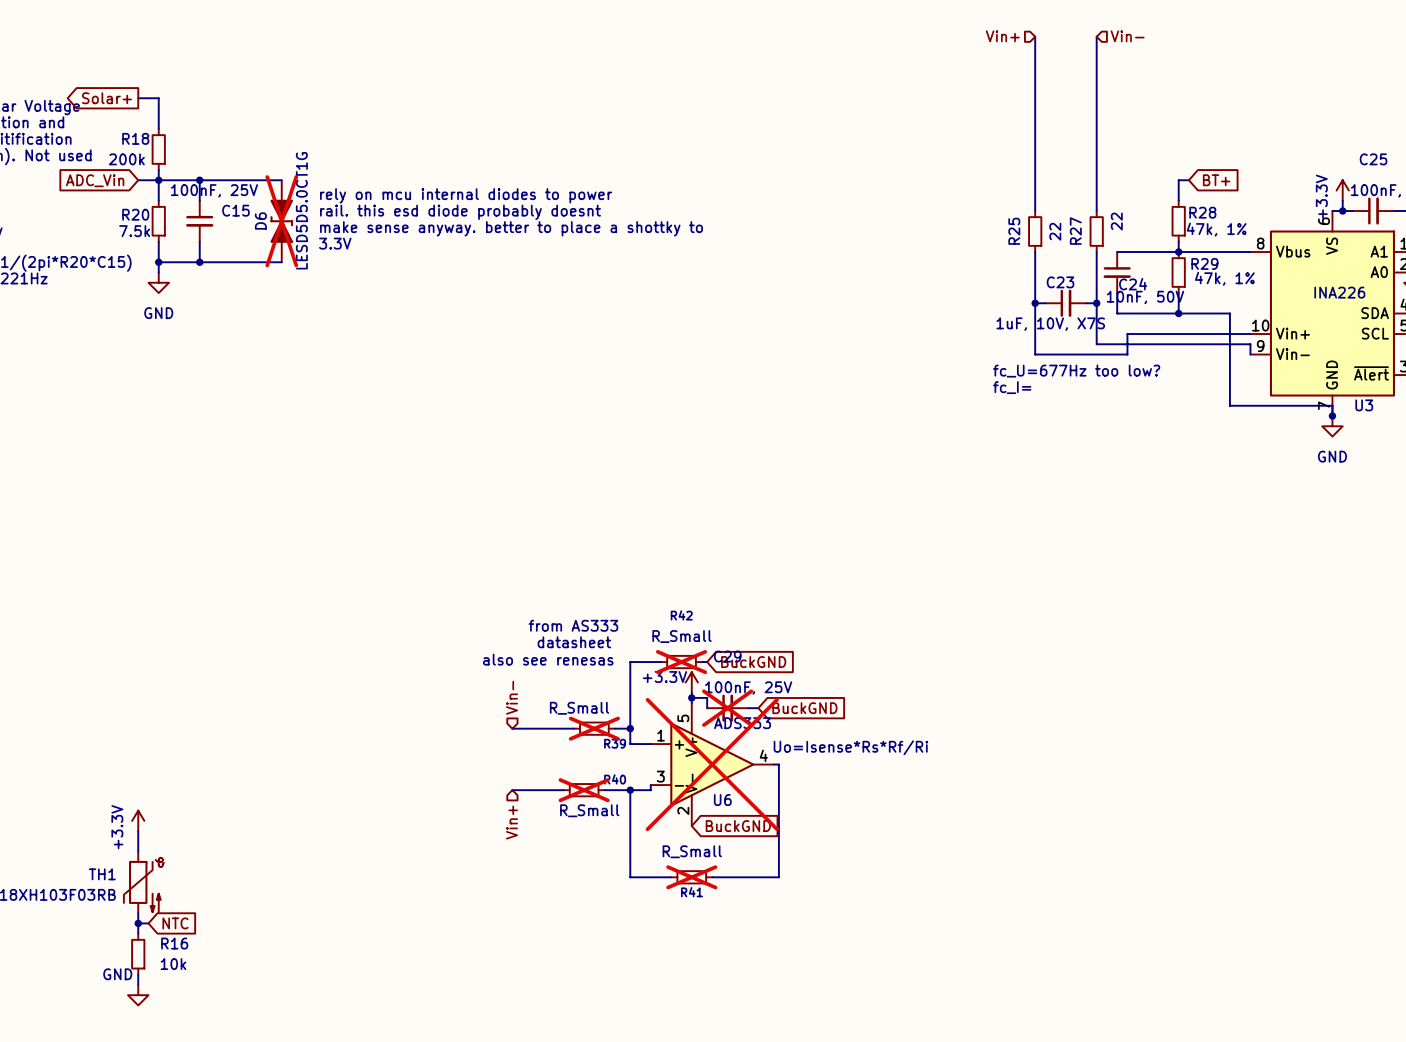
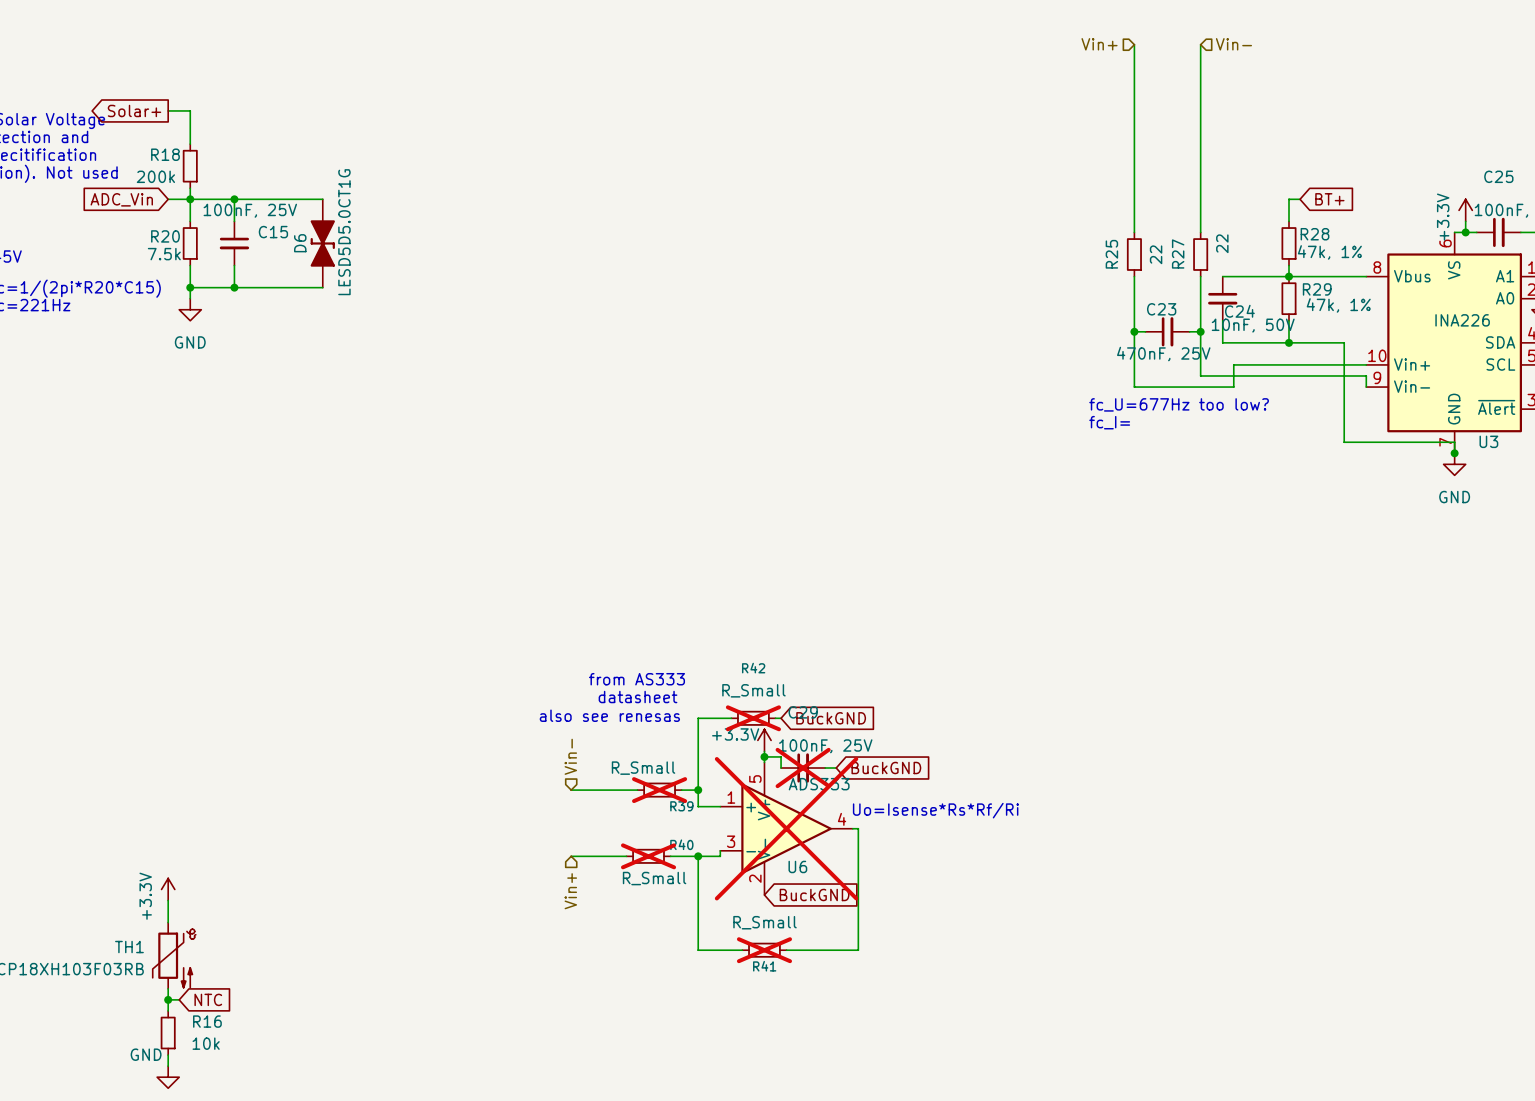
text: rely on mcu internal diodes to power (466, 195) -> none
text: rail. this esd diode probably doesnt (460, 212) -> none
D6 do-not-place cross: (281, 221) -> none
text: make sense anyway. better to place a shottky to (511, 228) -> none
text: 3.3V (335, 243) -> none
C23 value: 1uF, 10V, X7S (1050, 324) -> 470nF, 25V (1163, 354)

